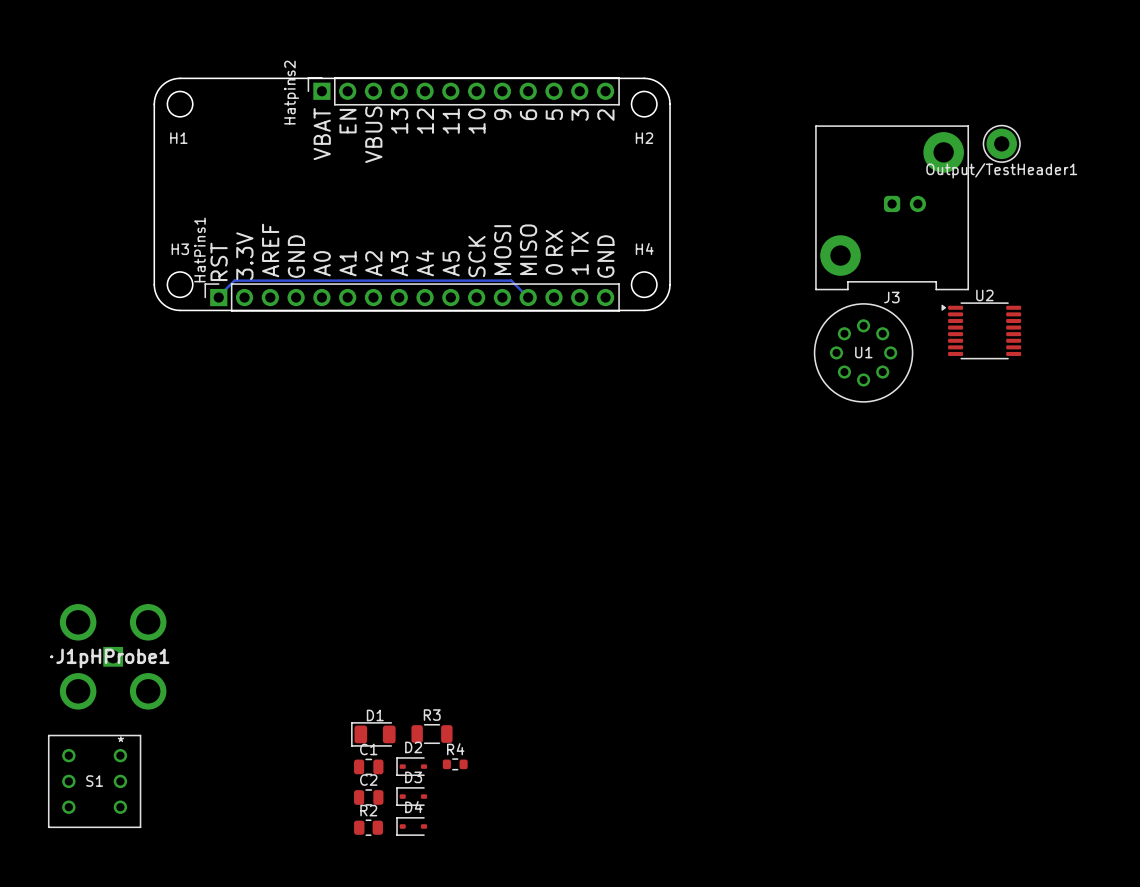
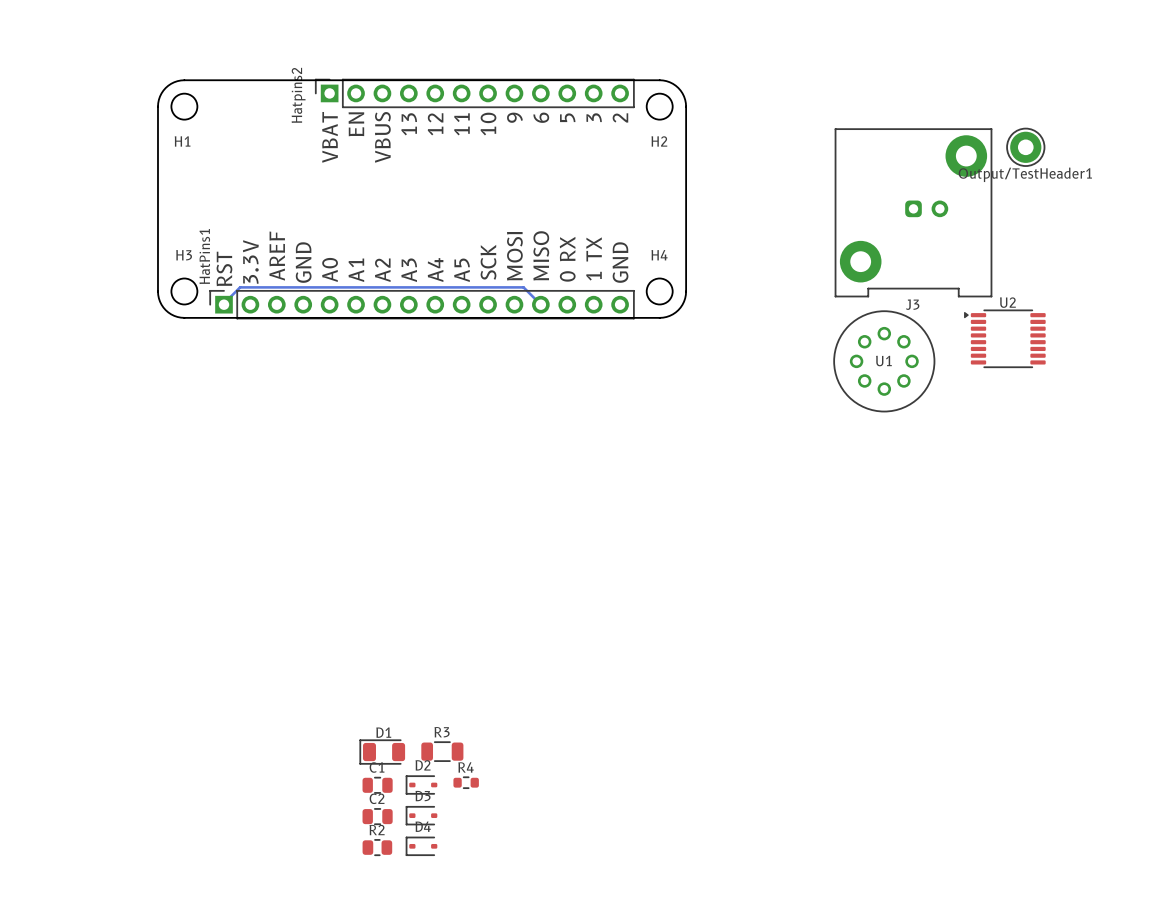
J1pHProbe1: (108, 656) -> none
S1: (94, 781) -> none

